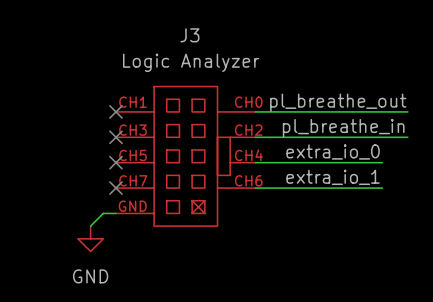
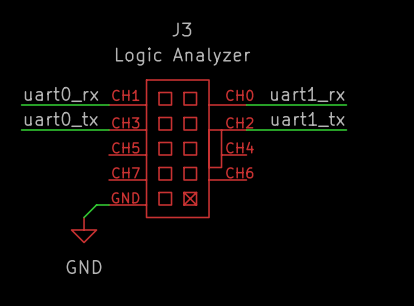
label: none -> uart0_rx (61, 94)
label: none -> uart1_rx (307, 94)
label: pl_breathe_out (338, 102) -> none
wire: none -> (21, 105) (109, 105)
no-connect mark: (115, 111) -> none
wire: (357, 111) (407, 111) -> none
label: none -> uart0_tx (61, 119)
label: none -> uart1_tx (308, 119)
label: pl_breathe_in (343, 128) -> none
wire: none -> (21, 129) (109, 129)
no-connect mark: (115, 137) -> none
wire: (357, 137) (407, 137) -> none
label: extra_io_0 (333, 151) -> none
no-connect mark: (115, 162) -> none
wire: (255, 162) (382, 162) -> none
label: extra_io_1 (333, 177) -> none
no-connect mark: (115, 188) -> none
wire: (255, 188) (382, 188) -> none

